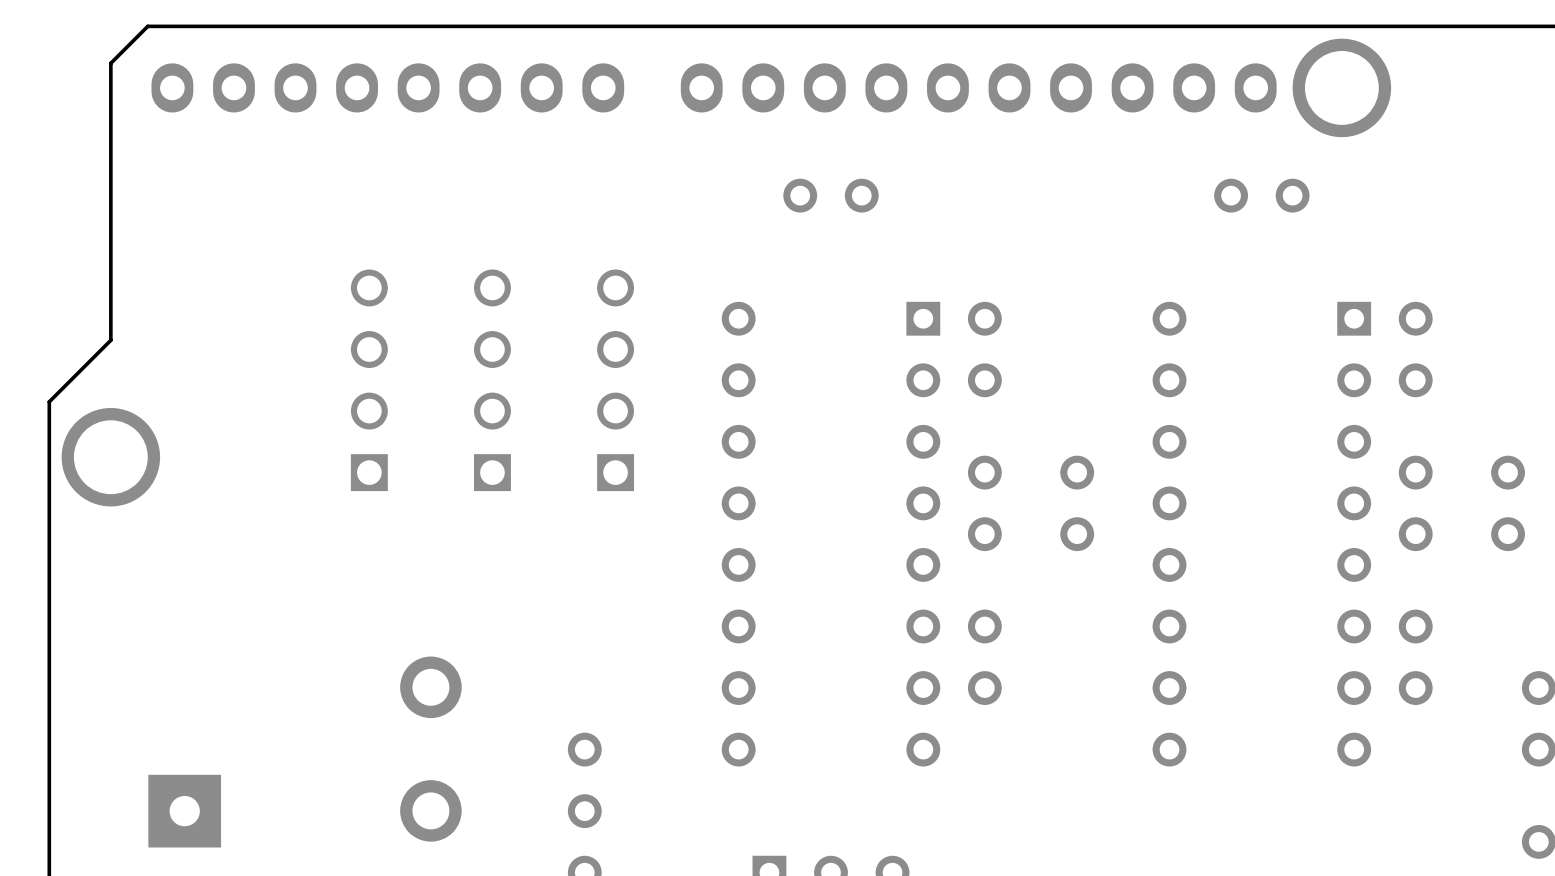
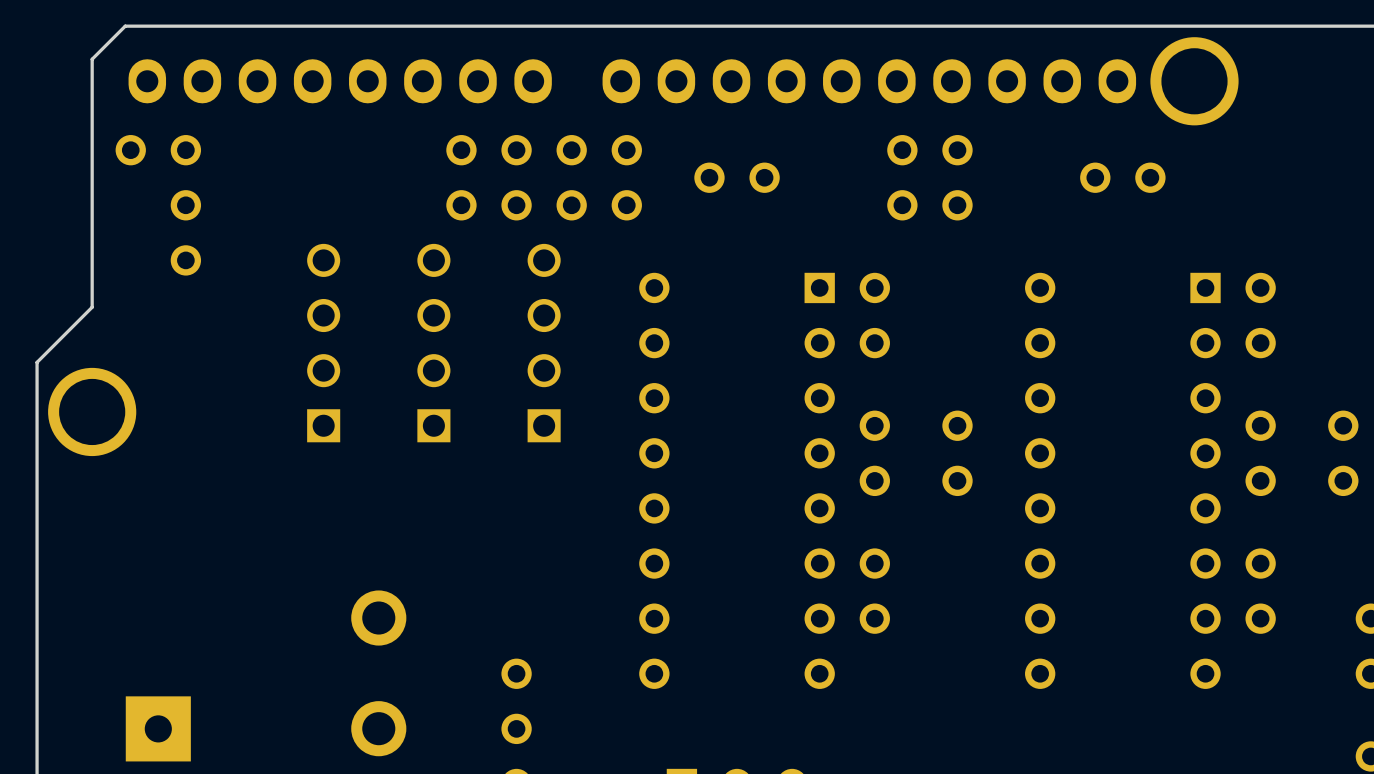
part: none -> (158, 150)
part: none -> (461, 177)
part: none -> (516, 177)
part: none -> (571, 177)
part: none -> (626, 177)
part: none -> (902, 177)
part: none -> (957, 177)
part: none -> (185, 232)

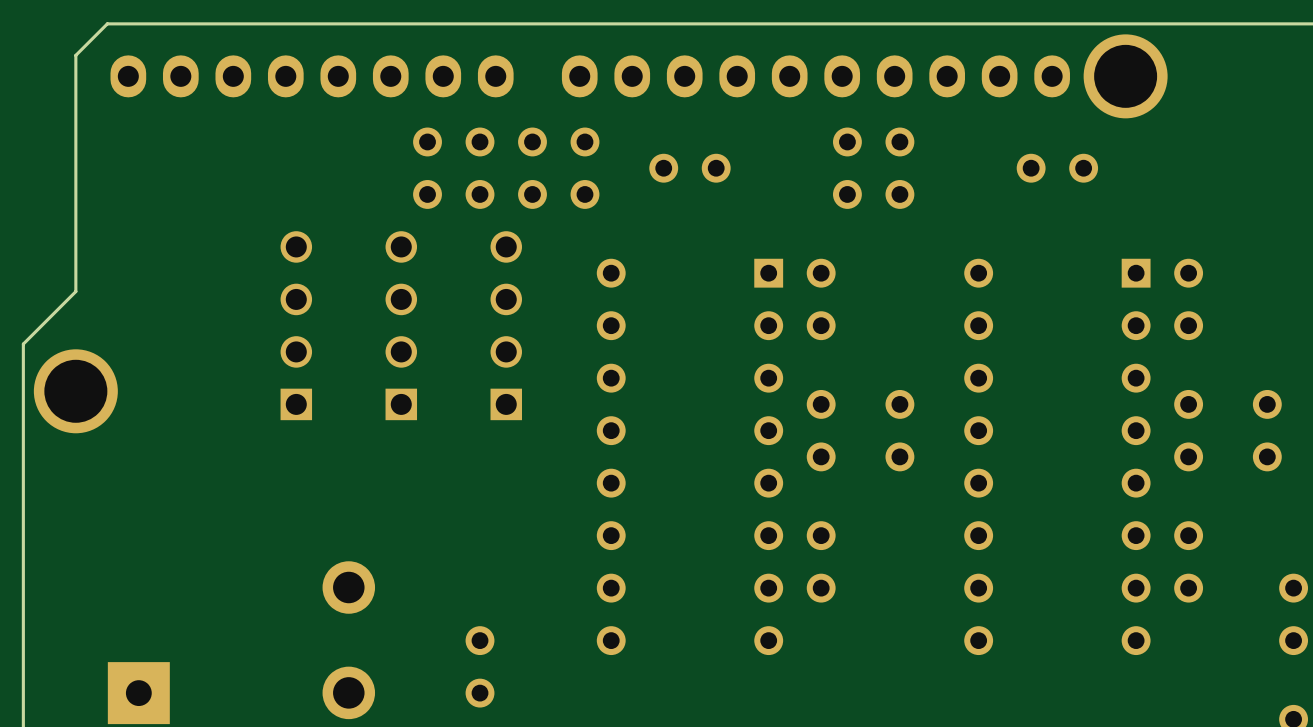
part: (158, 150) -> none
part: (185, 232) -> none

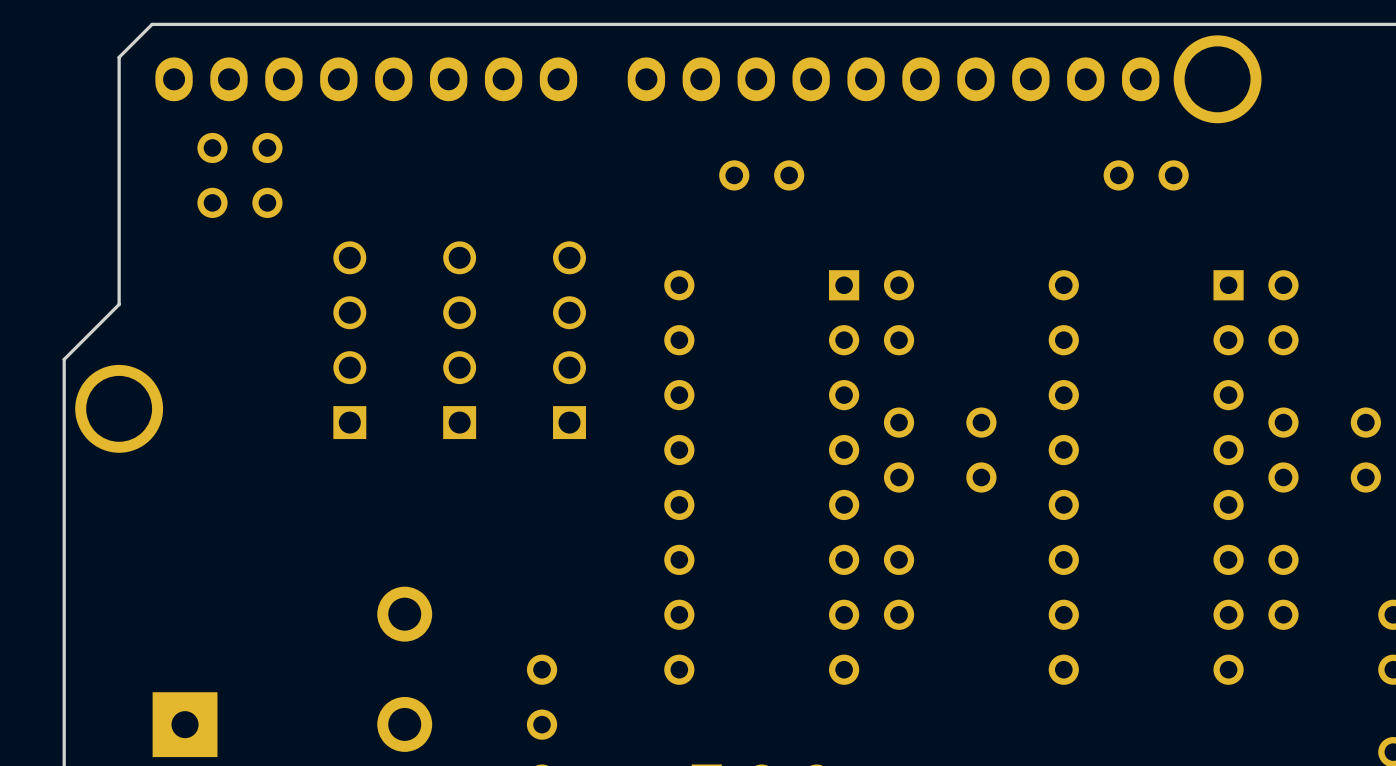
part: none -> (212, 175)
part: none -> (267, 175)
part: (427, 168) -> none
part: (480, 168) -> none
part: (532, 168) -> none
part: (584, 168) -> none
part: (847, 168) -> none
part: (899, 168) -> none

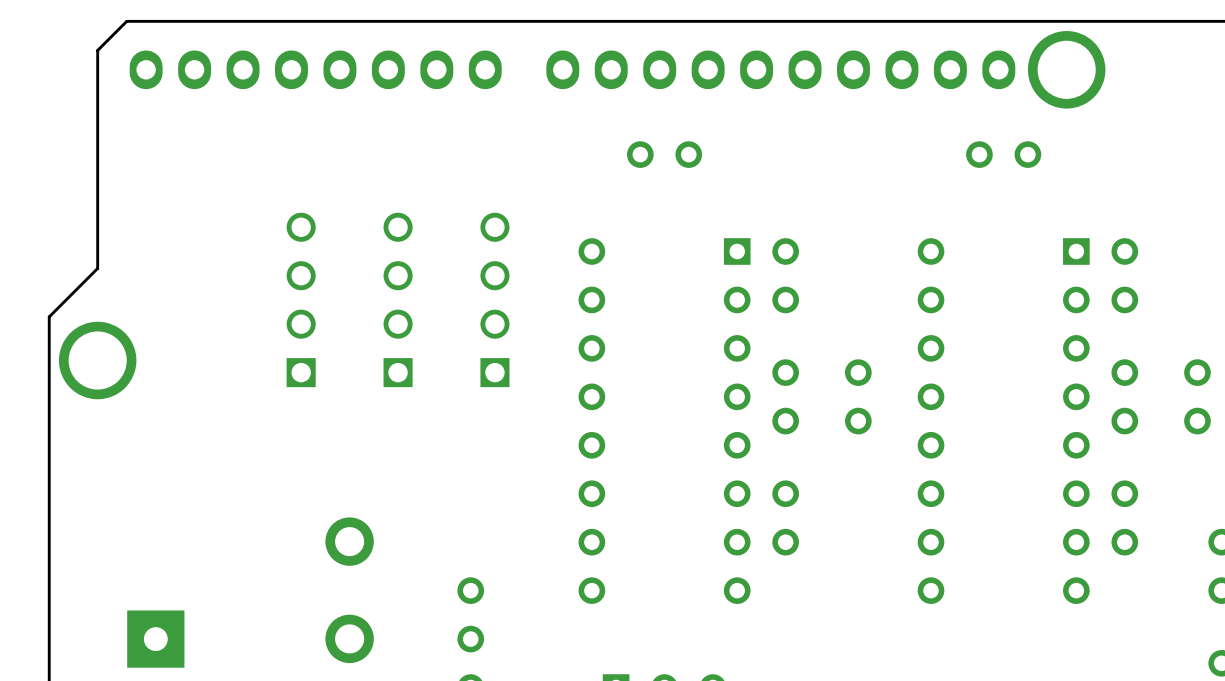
part: (212, 175) -> none
part: (267, 175) -> none

